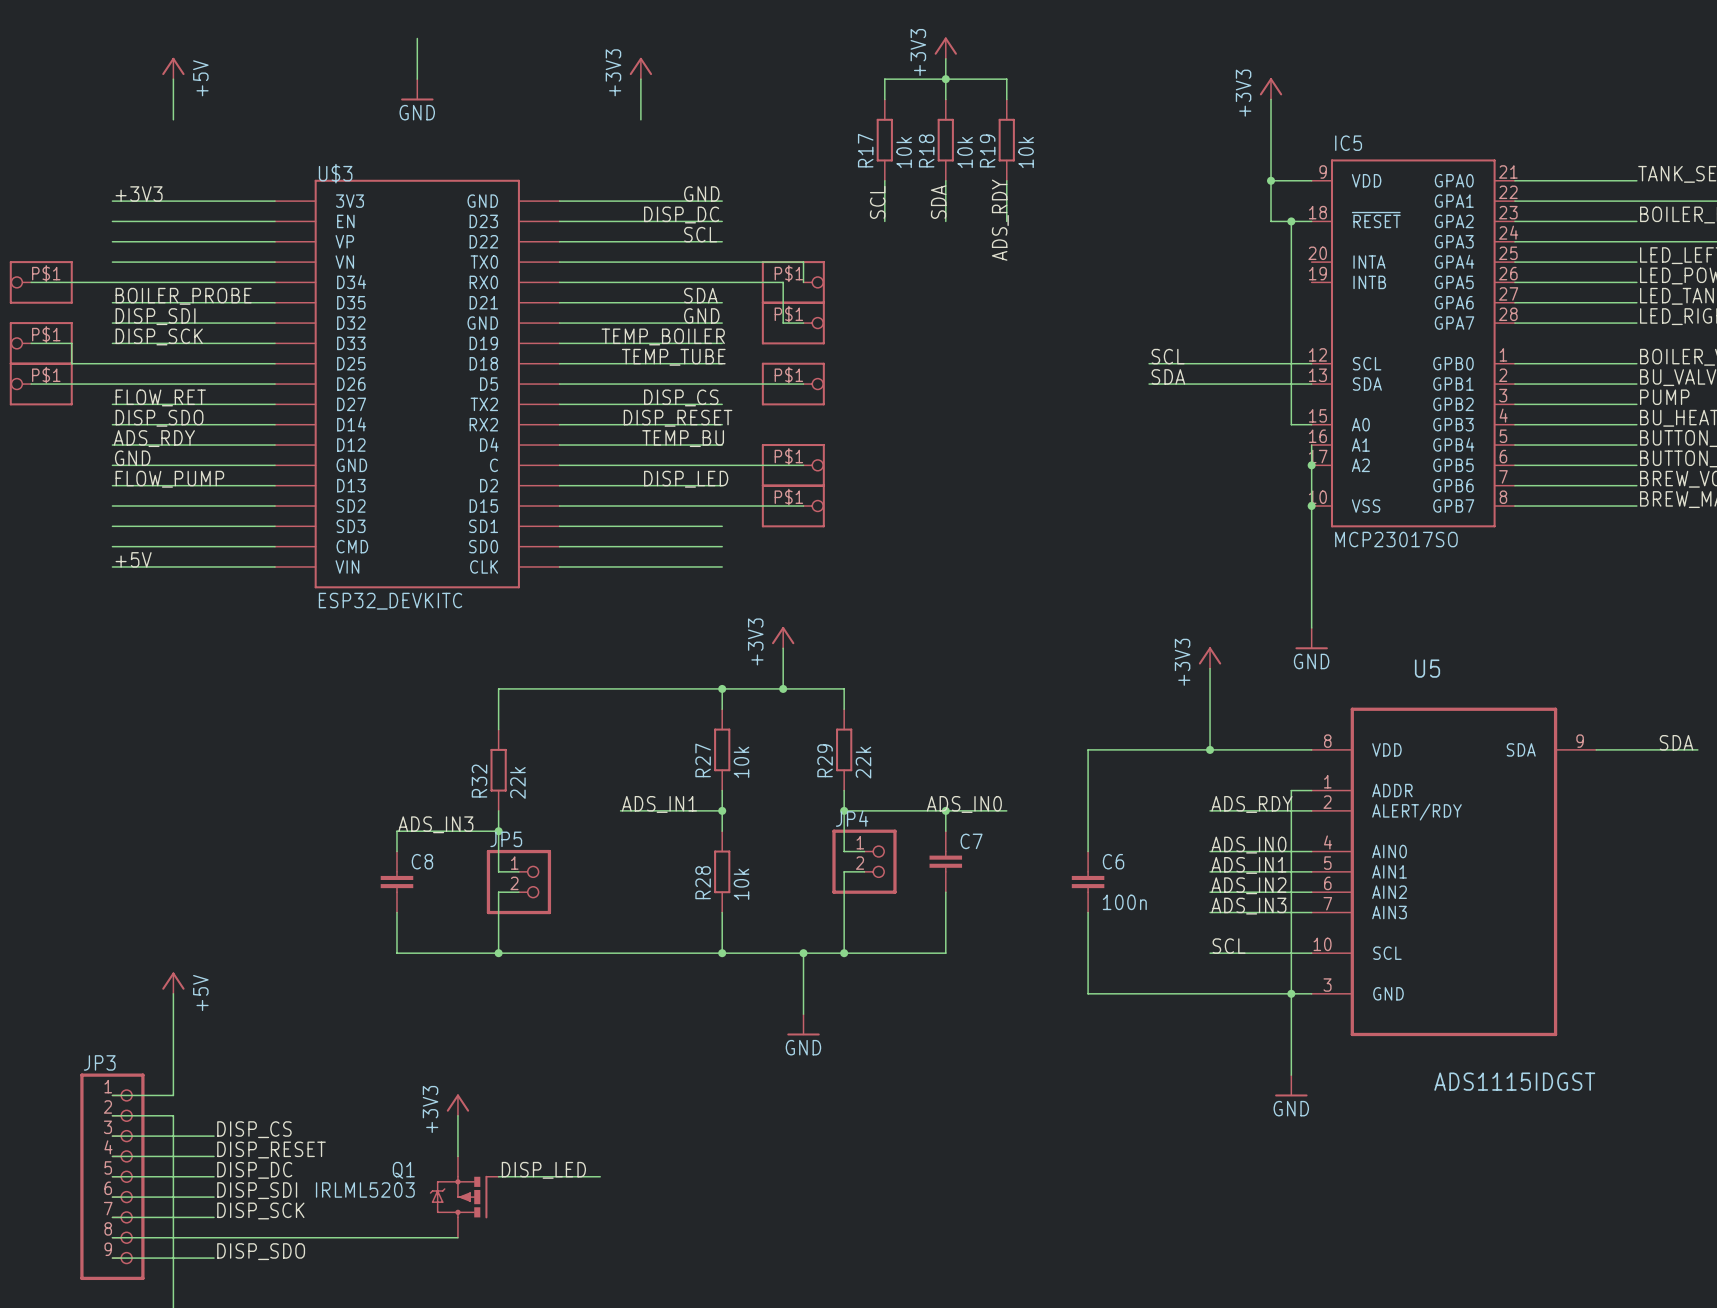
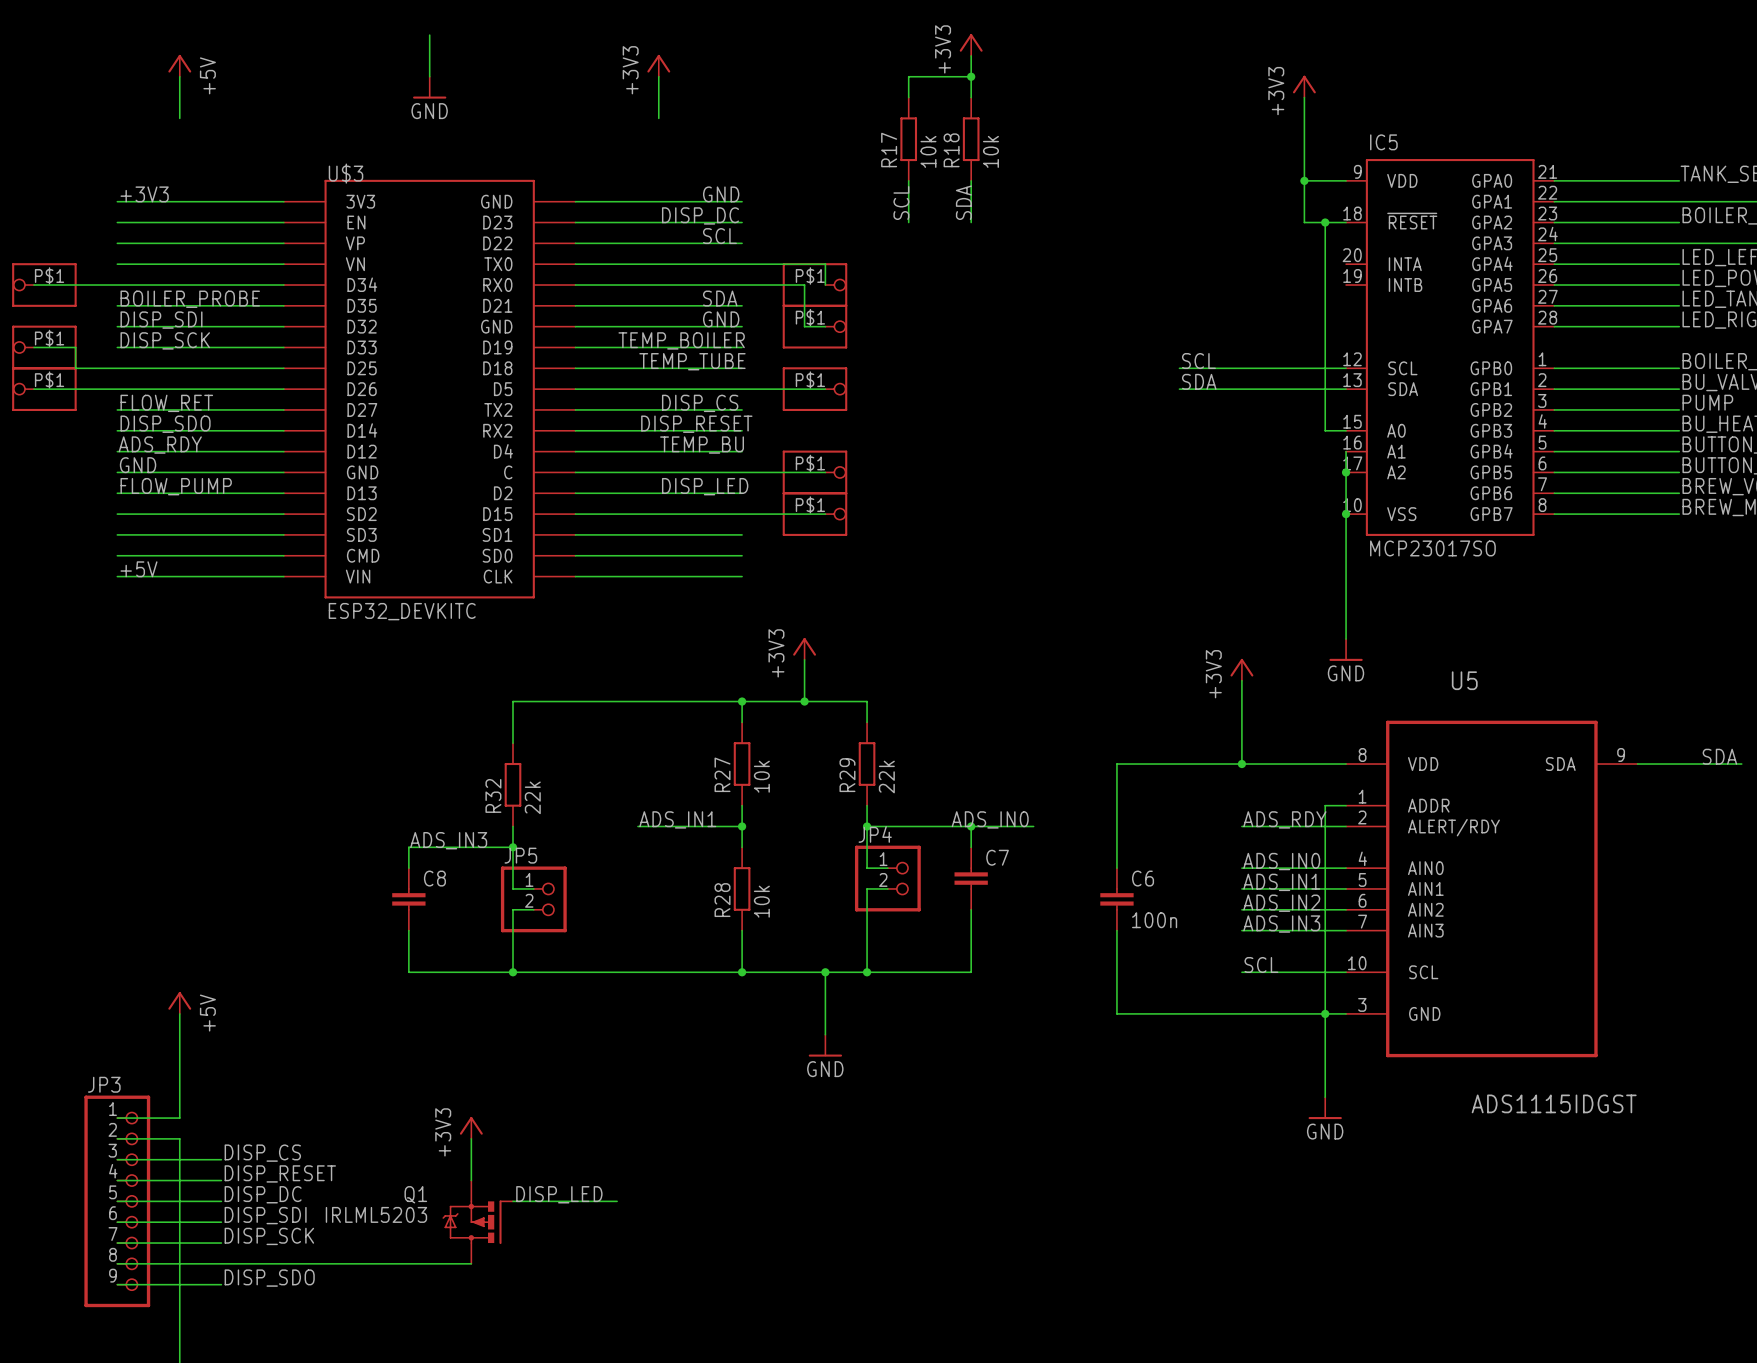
wire: (945, 79) (1006, 79) (1006, 99) -> none
R19: 10k (1006, 140) -> none
wire: (1006, 180) (1006, 221) -> none
label: ADS_RDY (1000, 220) -> none

